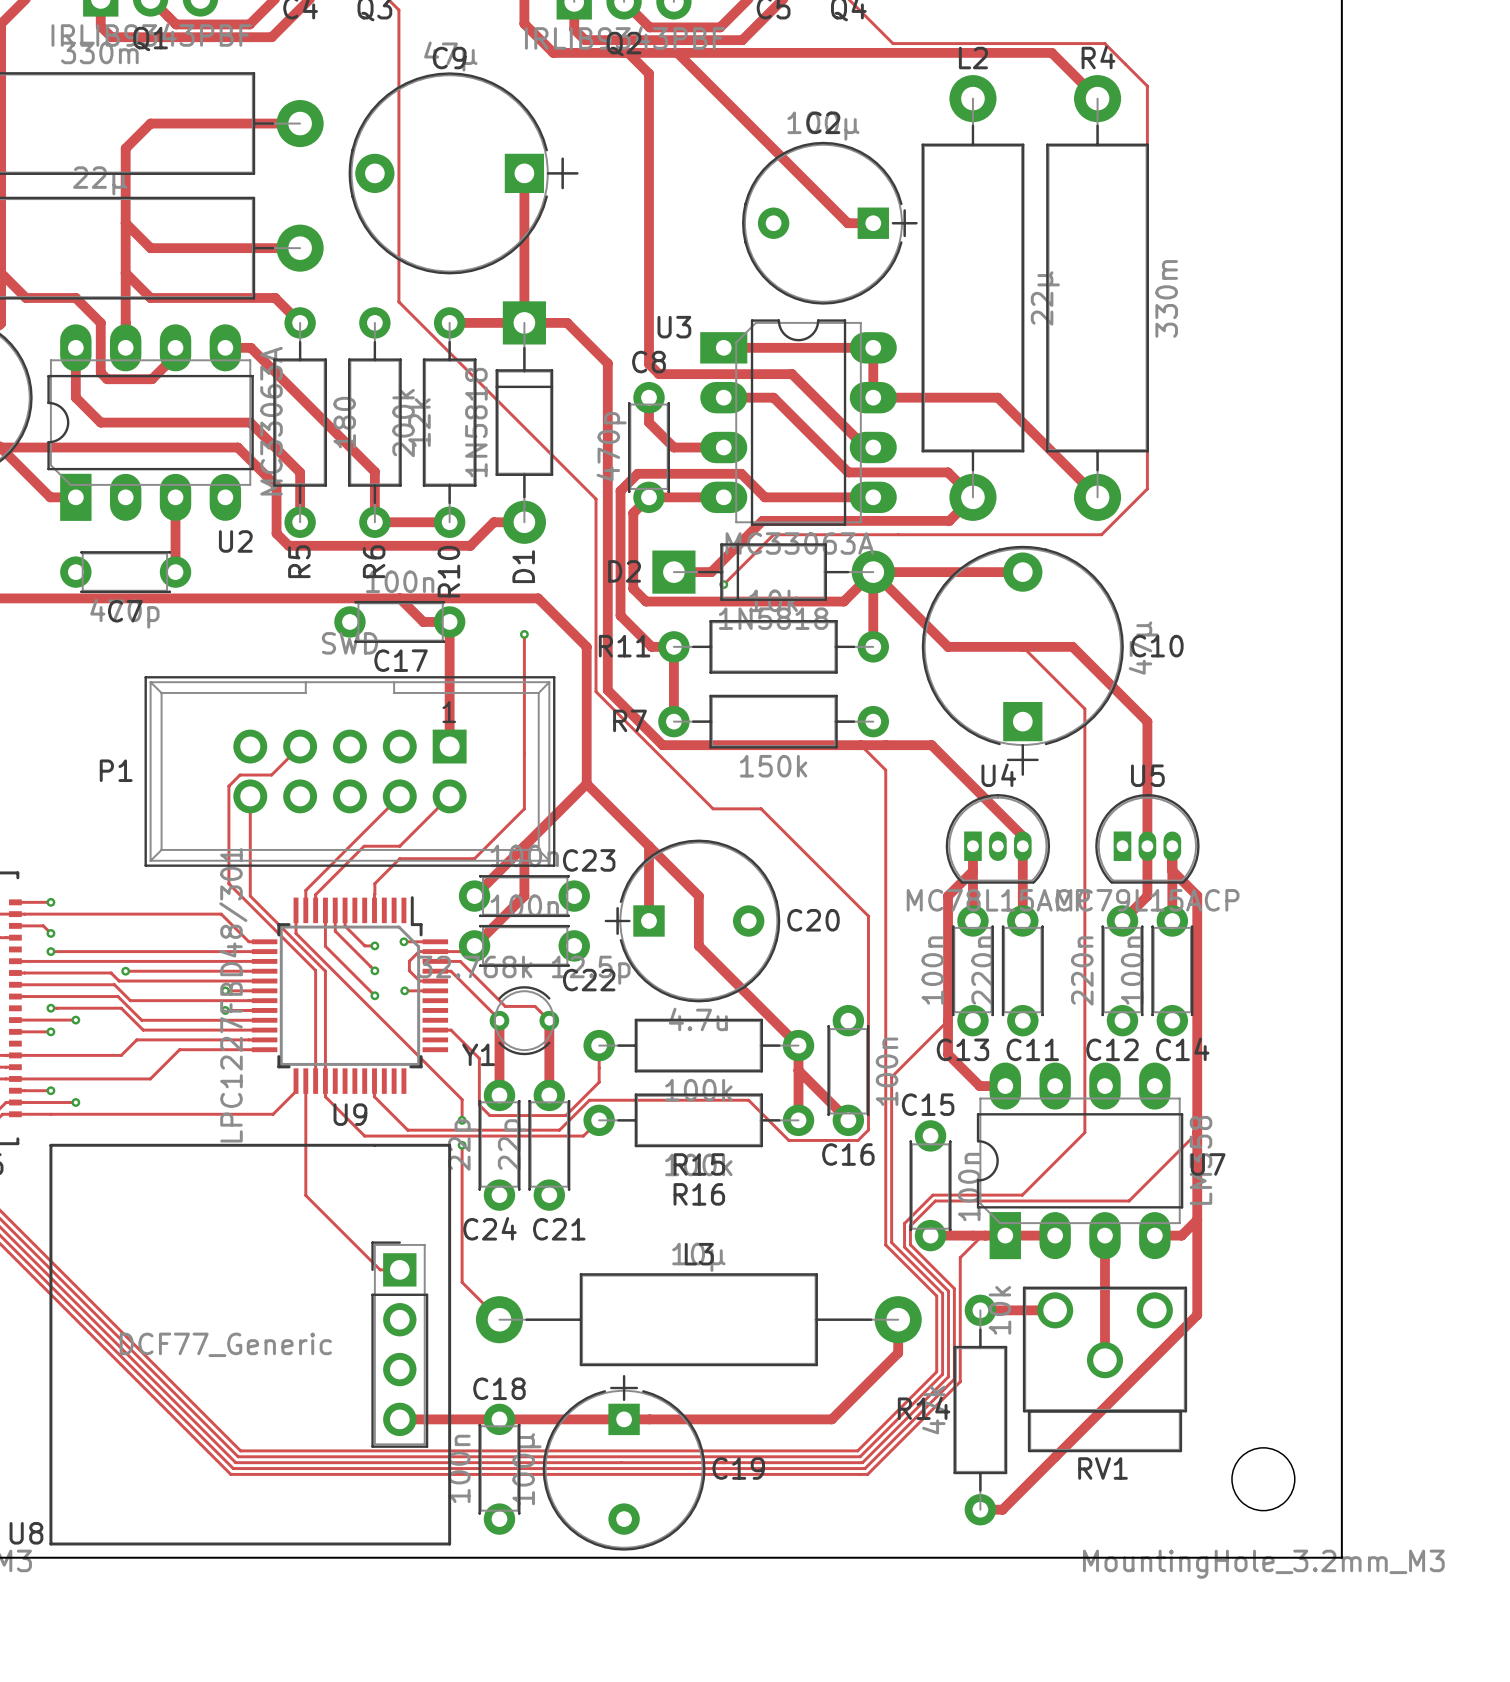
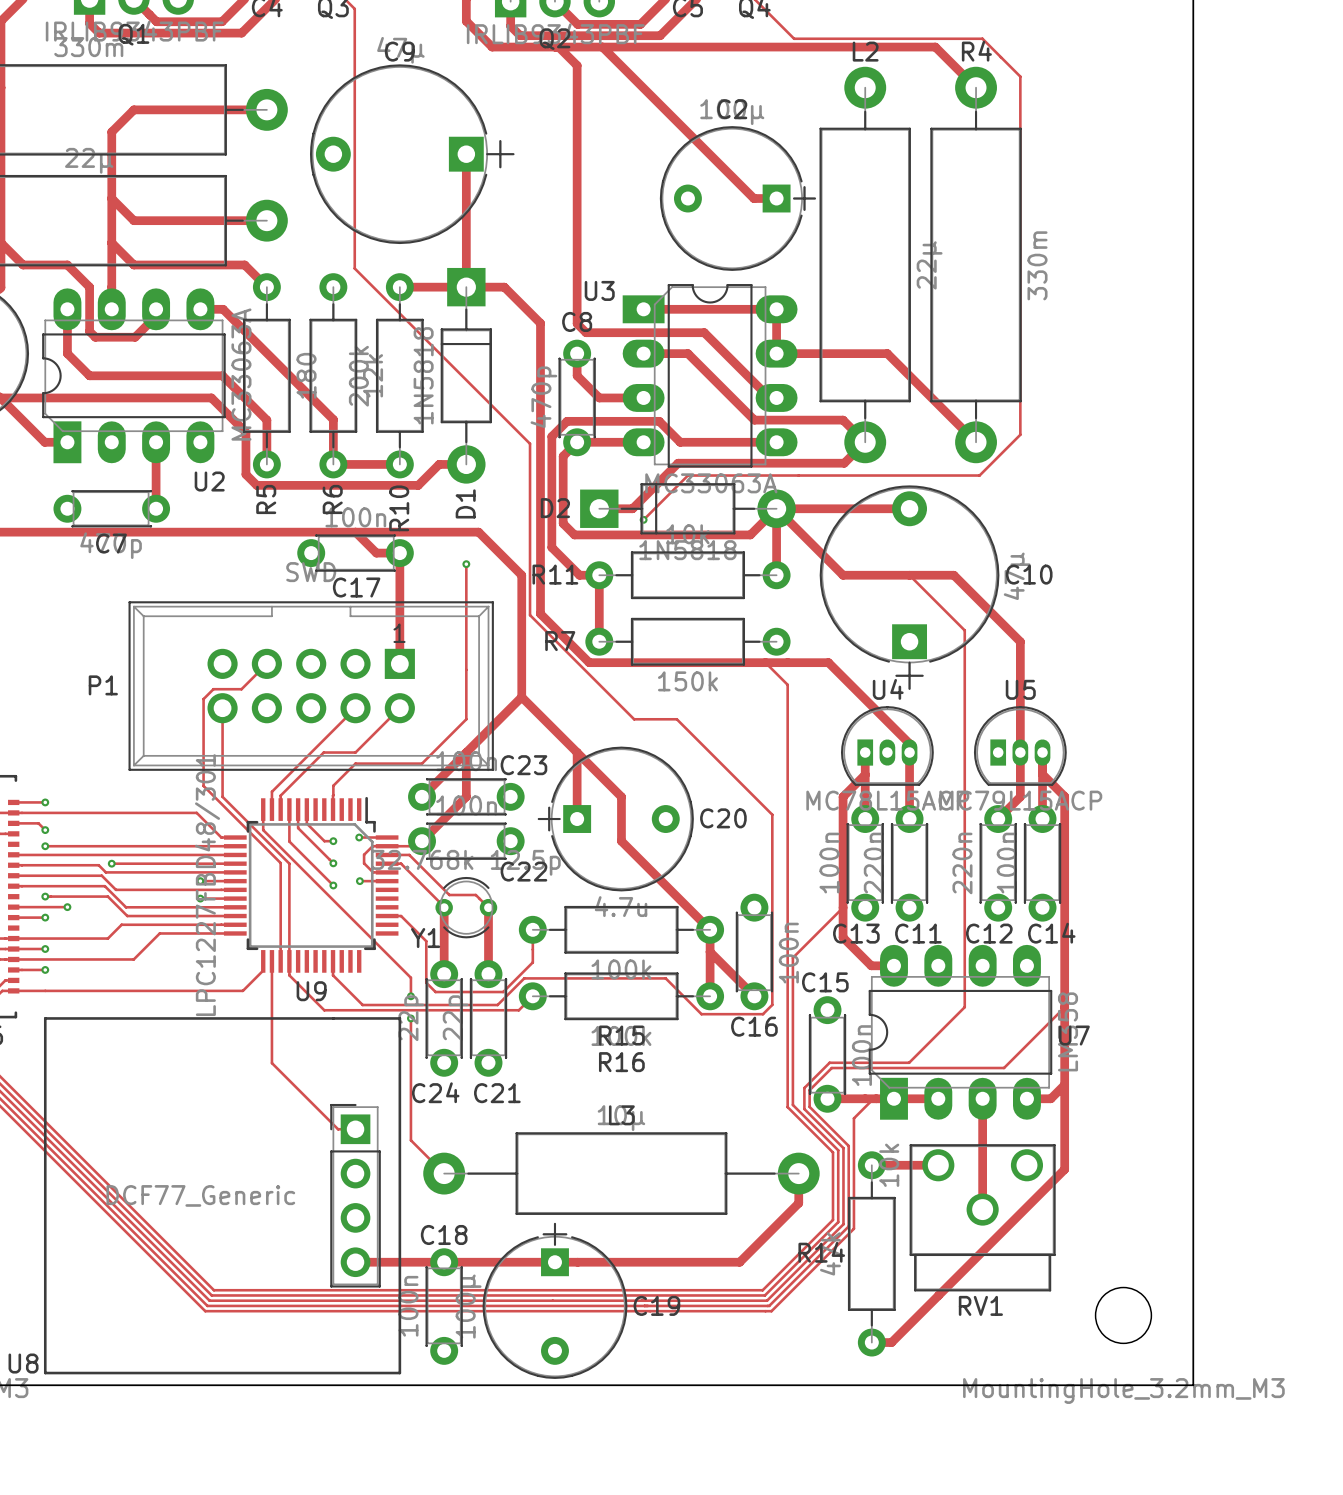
track: none -> (13, 949) (45, 949)
track: (15, 1102) (75, 1102) -> none
via position: (75, 1102) -> (45, 949)

